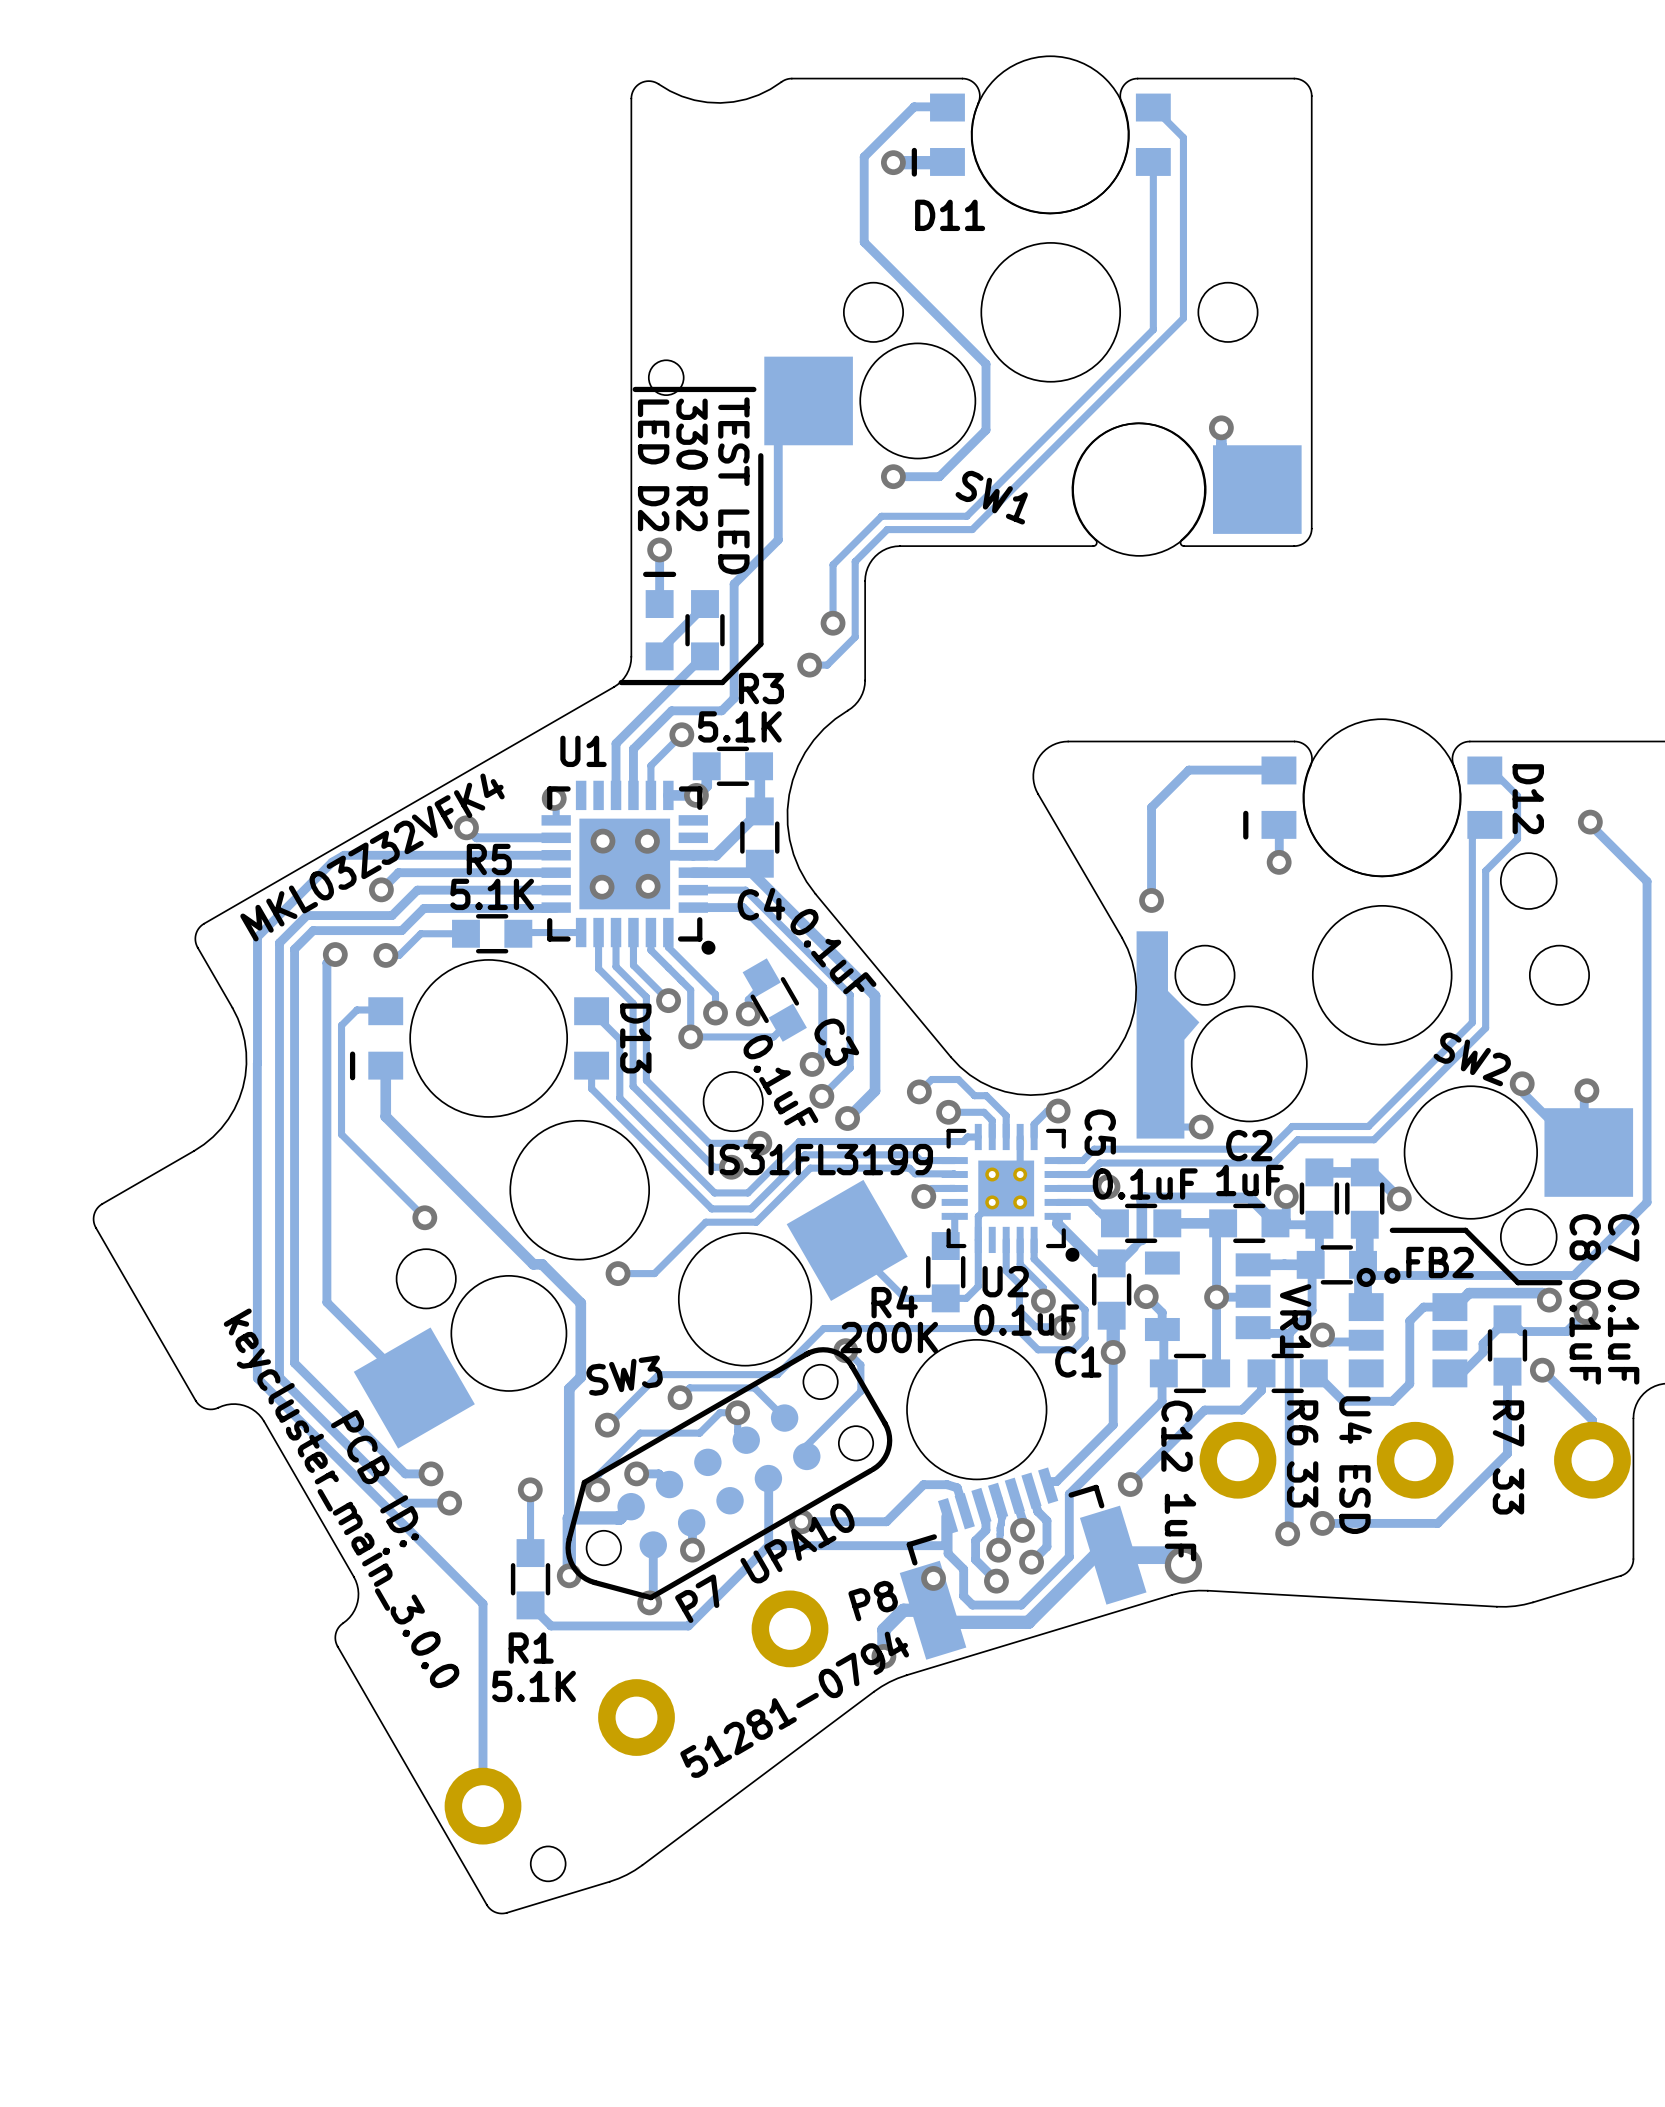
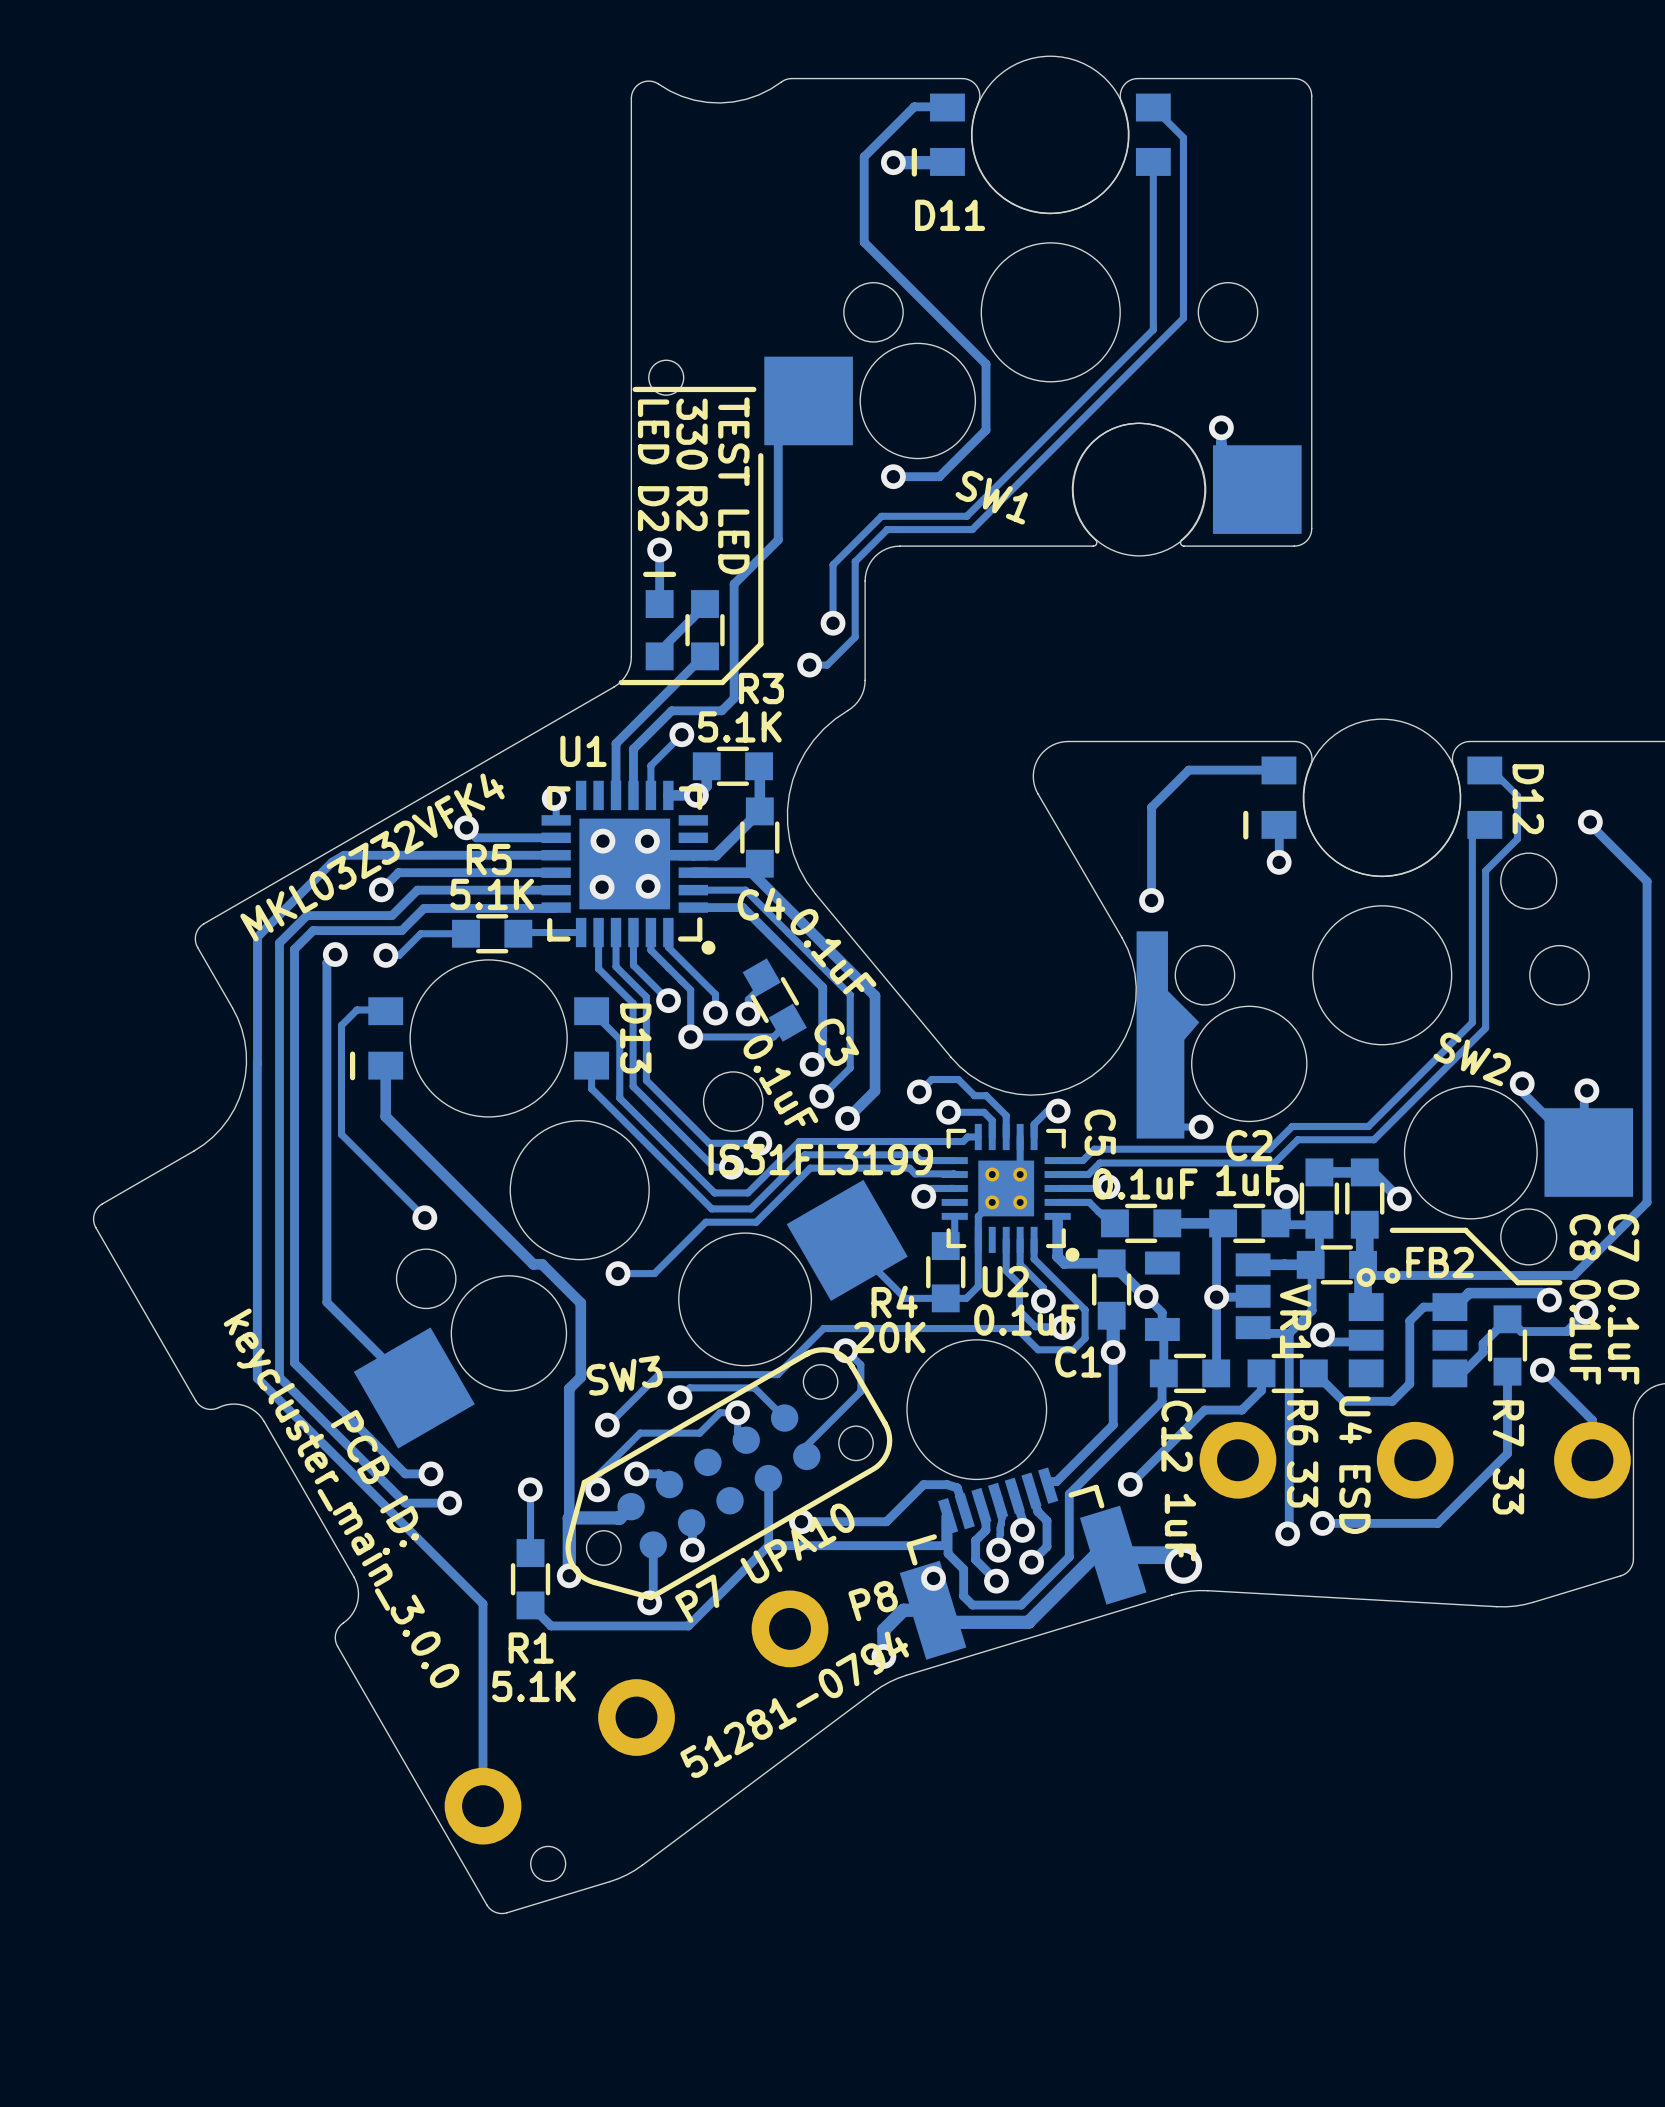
track: (1057, 1223) (1095, 1261) (1106, 1261) -> (1057, 1223) (1057, 1256) (1064, 1263) (1111, 1263) (1144, 1296)
track: (1275, 1223) (1249, 1197) (1144, 1197) (1141, 1200) (1141, 1240) -> none
track: (1141, 1240) (1118, 1263) (1134, 1247) -> none
R4 value: 200K (889, 1337) -> 20K (889, 1337)

